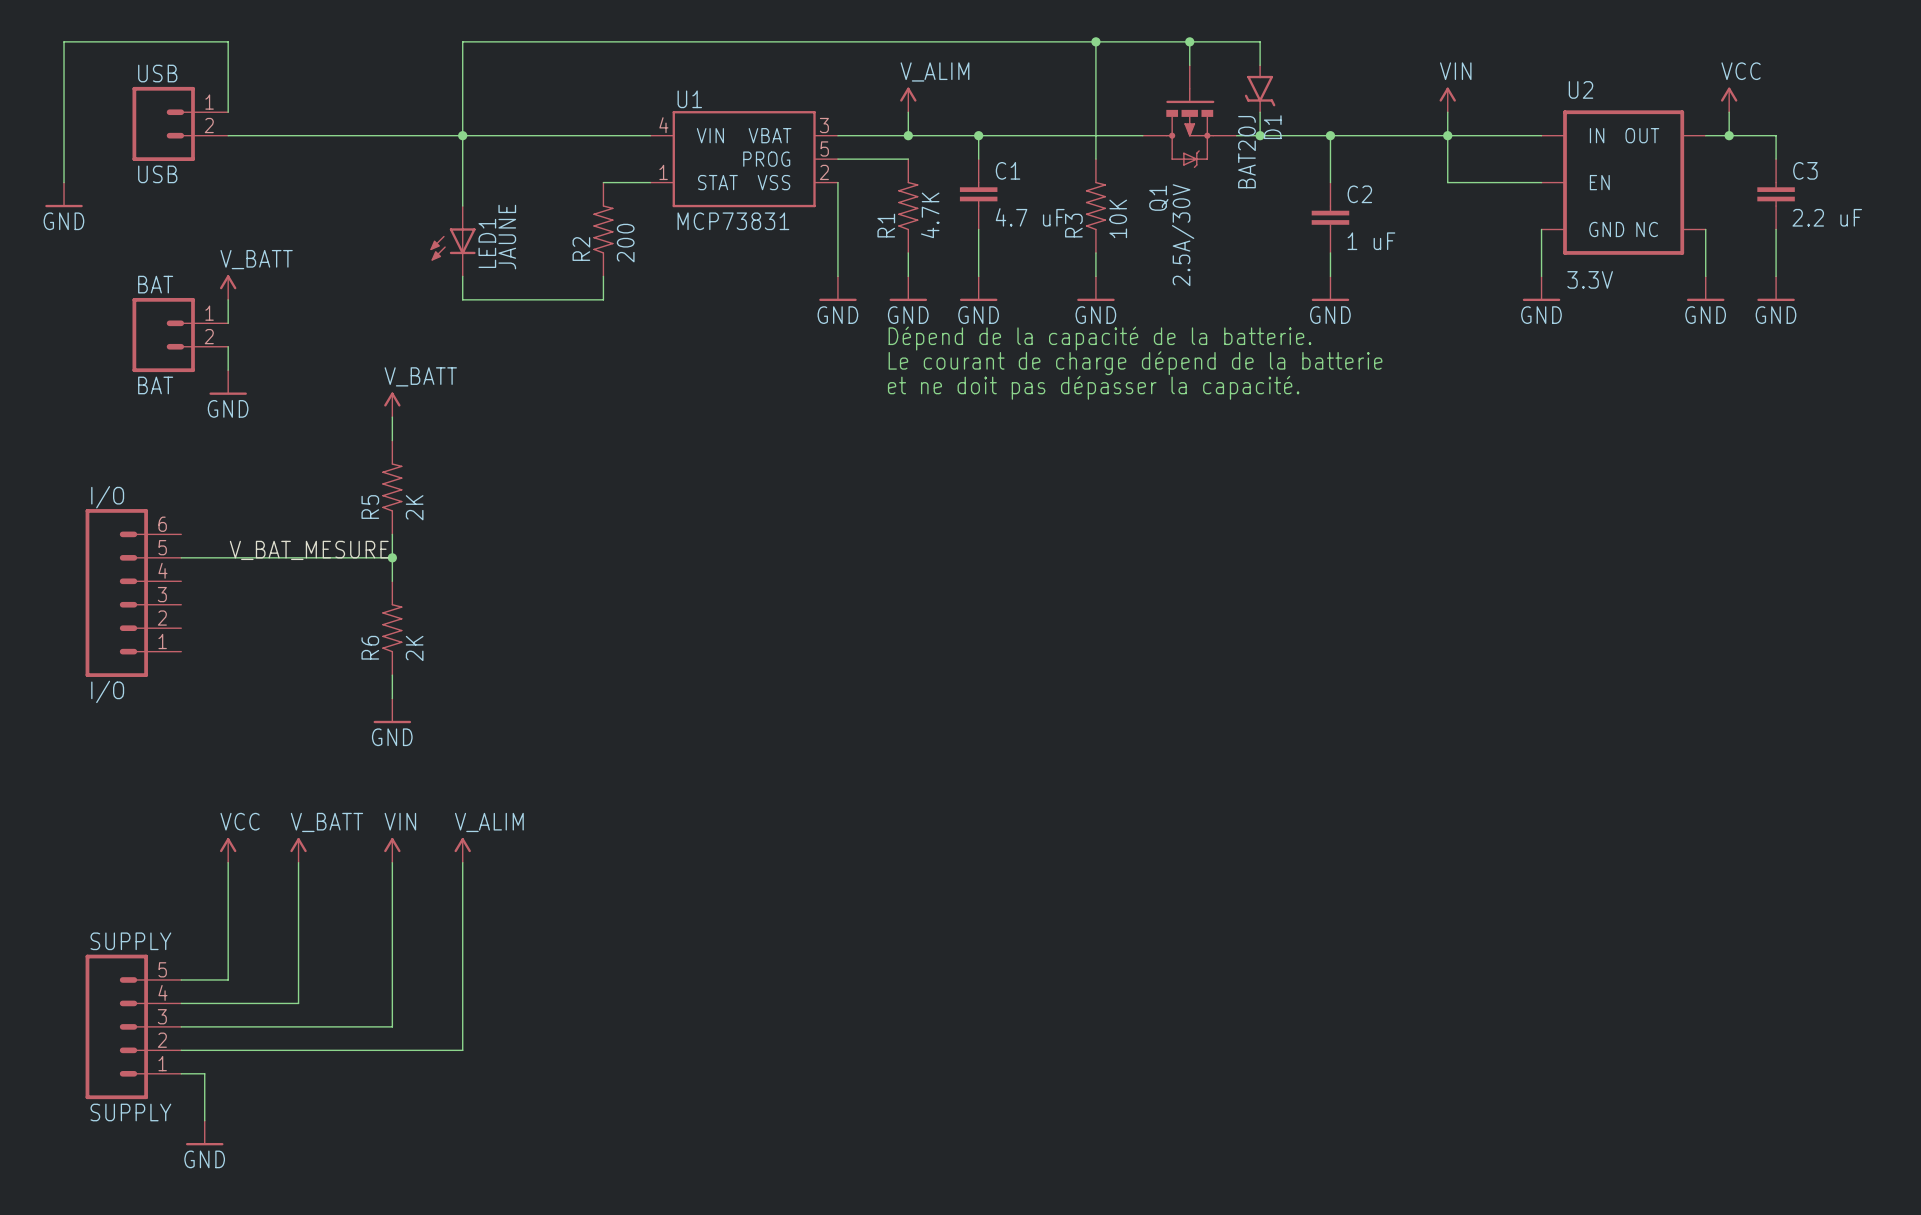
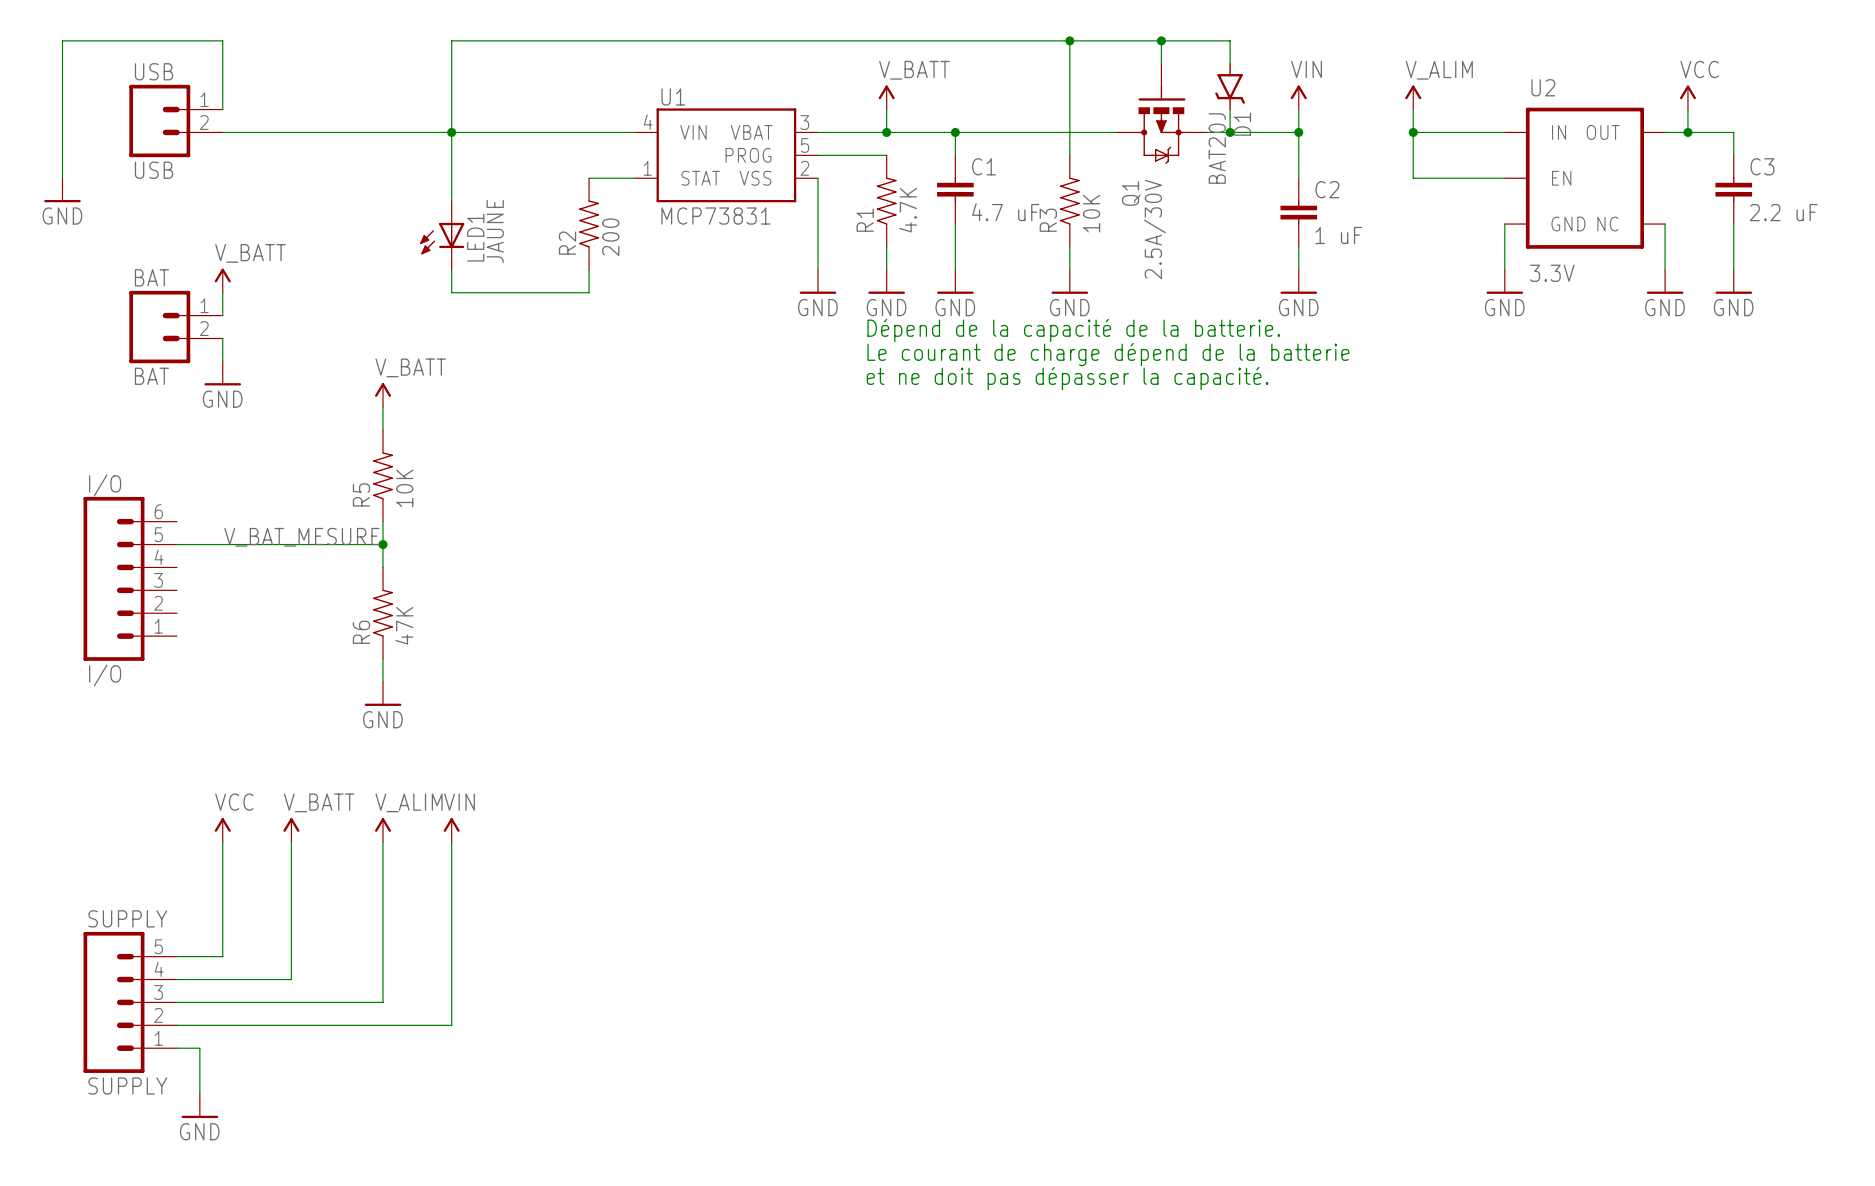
power symbol: V_ALIM (908, 99) -> V_BATT (886, 97)
power symbol: none -> VIN (1298, 97)
power symbol: VIN (1447, 99) -> V_ALIM (1413, 97)
wire: (1330, 135) (1447, 135) -> (1298, 132) (1298, 109)
R5 value: 2K (414, 507) -> 10K (404, 488)
R6 value: 2K (414, 648) -> 47K (404, 625)
power symbol: VIN (392, 850) -> V_ALIM (383, 830)
power symbol: V_ALIM (462, 850) -> VIN (451, 830)

